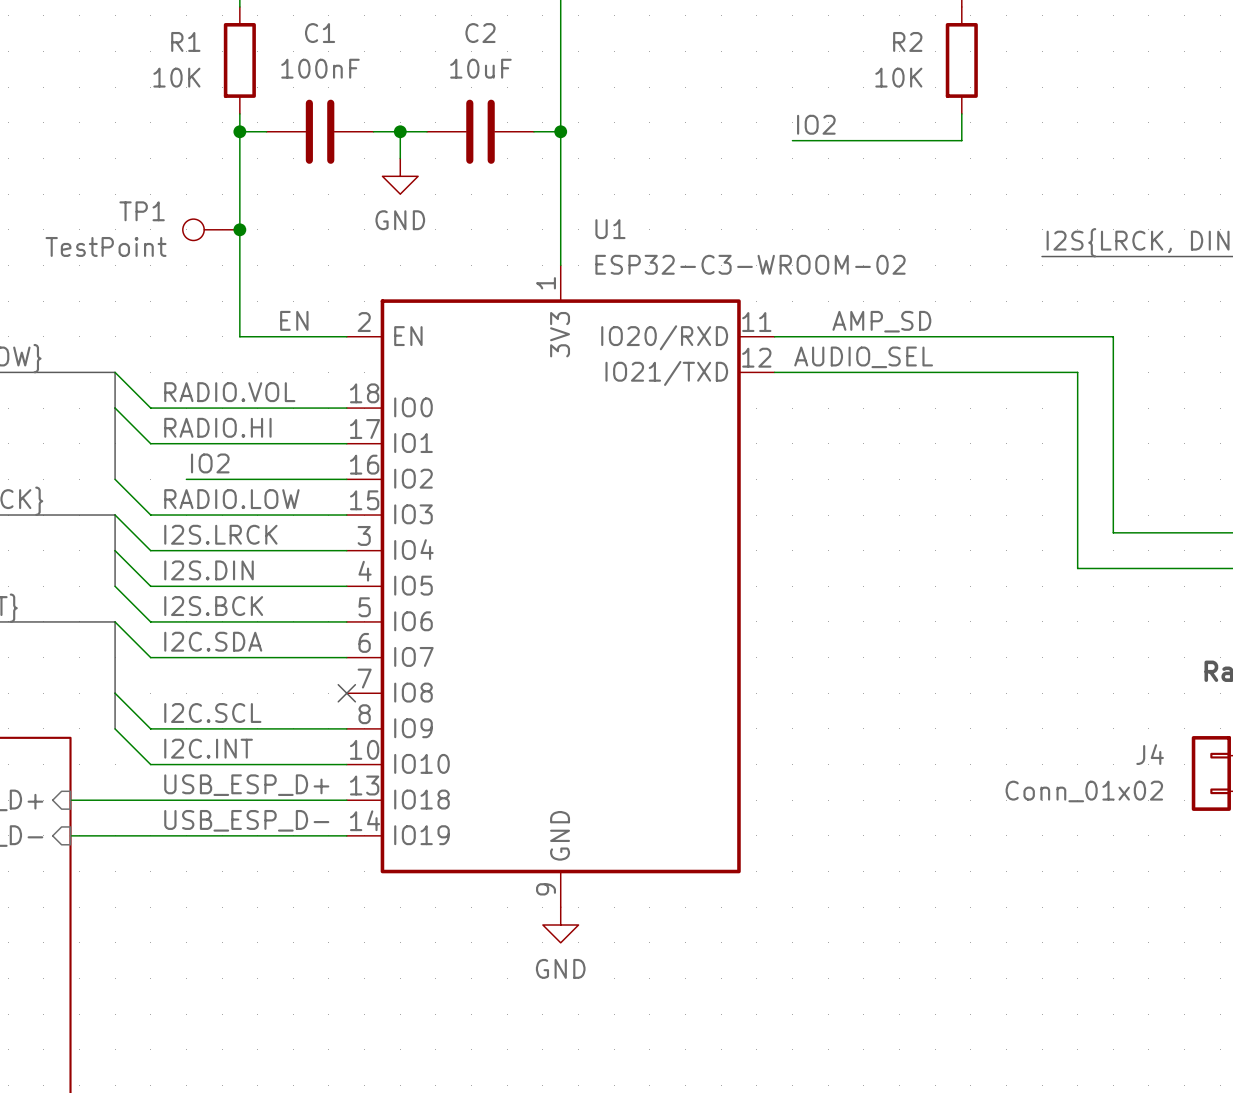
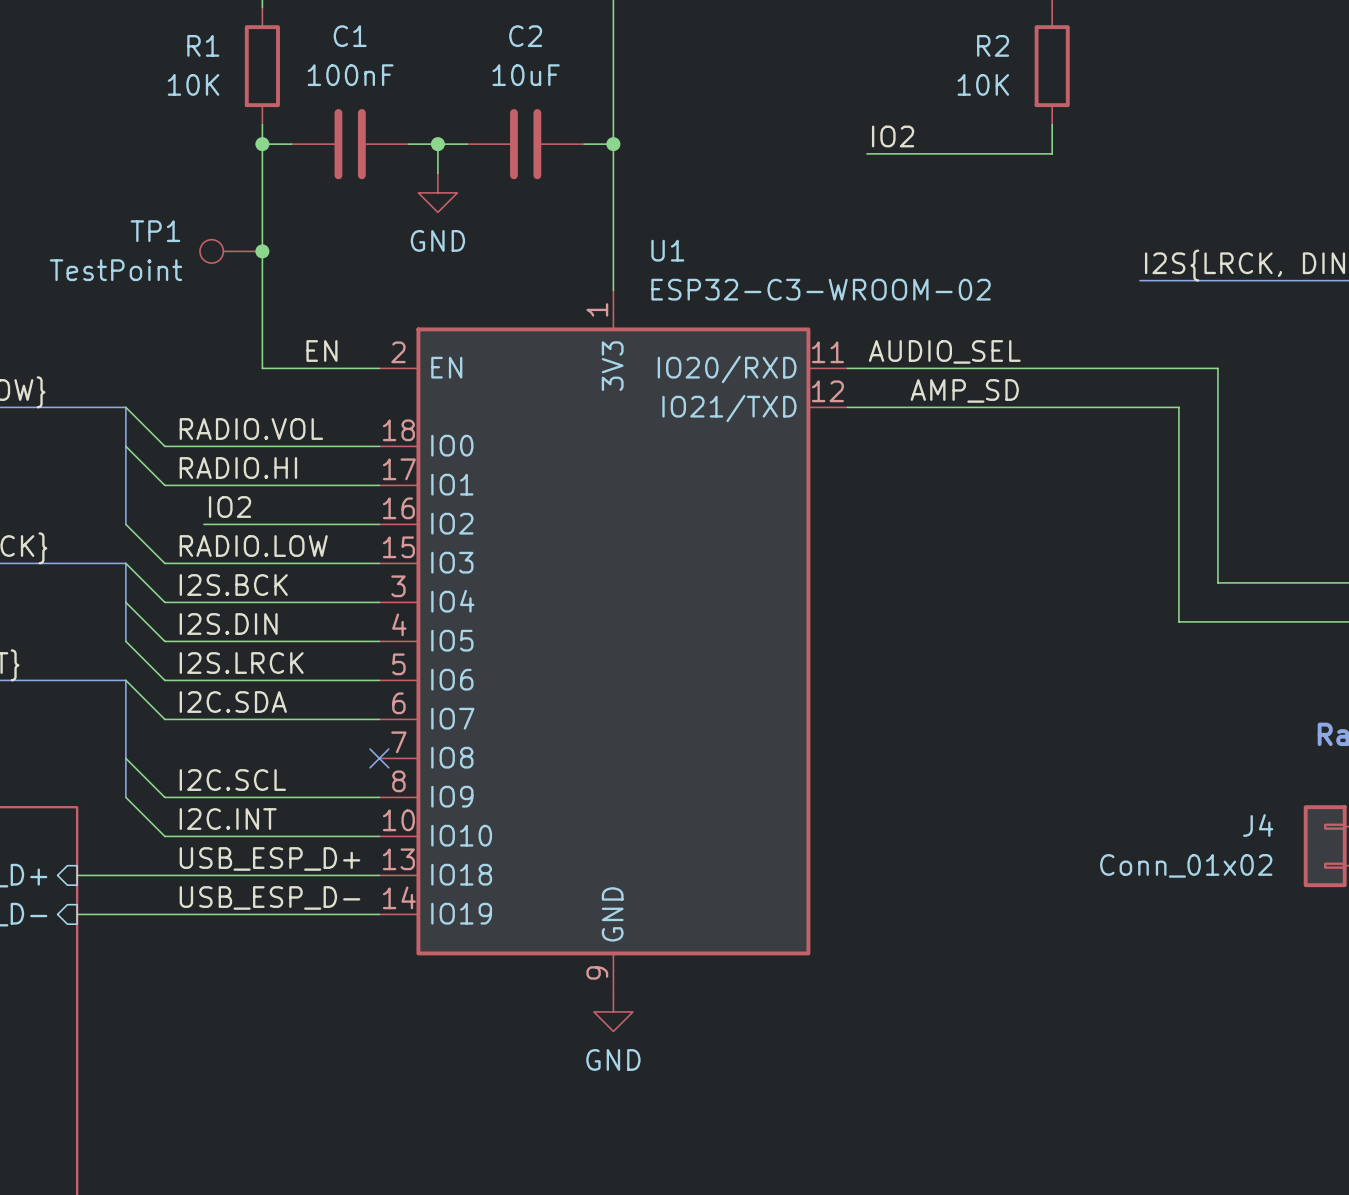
label: AMP_SD (881, 321) -> AUDIO_SEL (944, 351)
label: AUDIO_SEL (863, 357) -> AMP_SD (964, 390)
label: I2S.LRCK (220, 534) -> I2S.BCK (233, 585)
label: I2S.BCK (213, 606) -> I2S.LRCK (241, 663)

